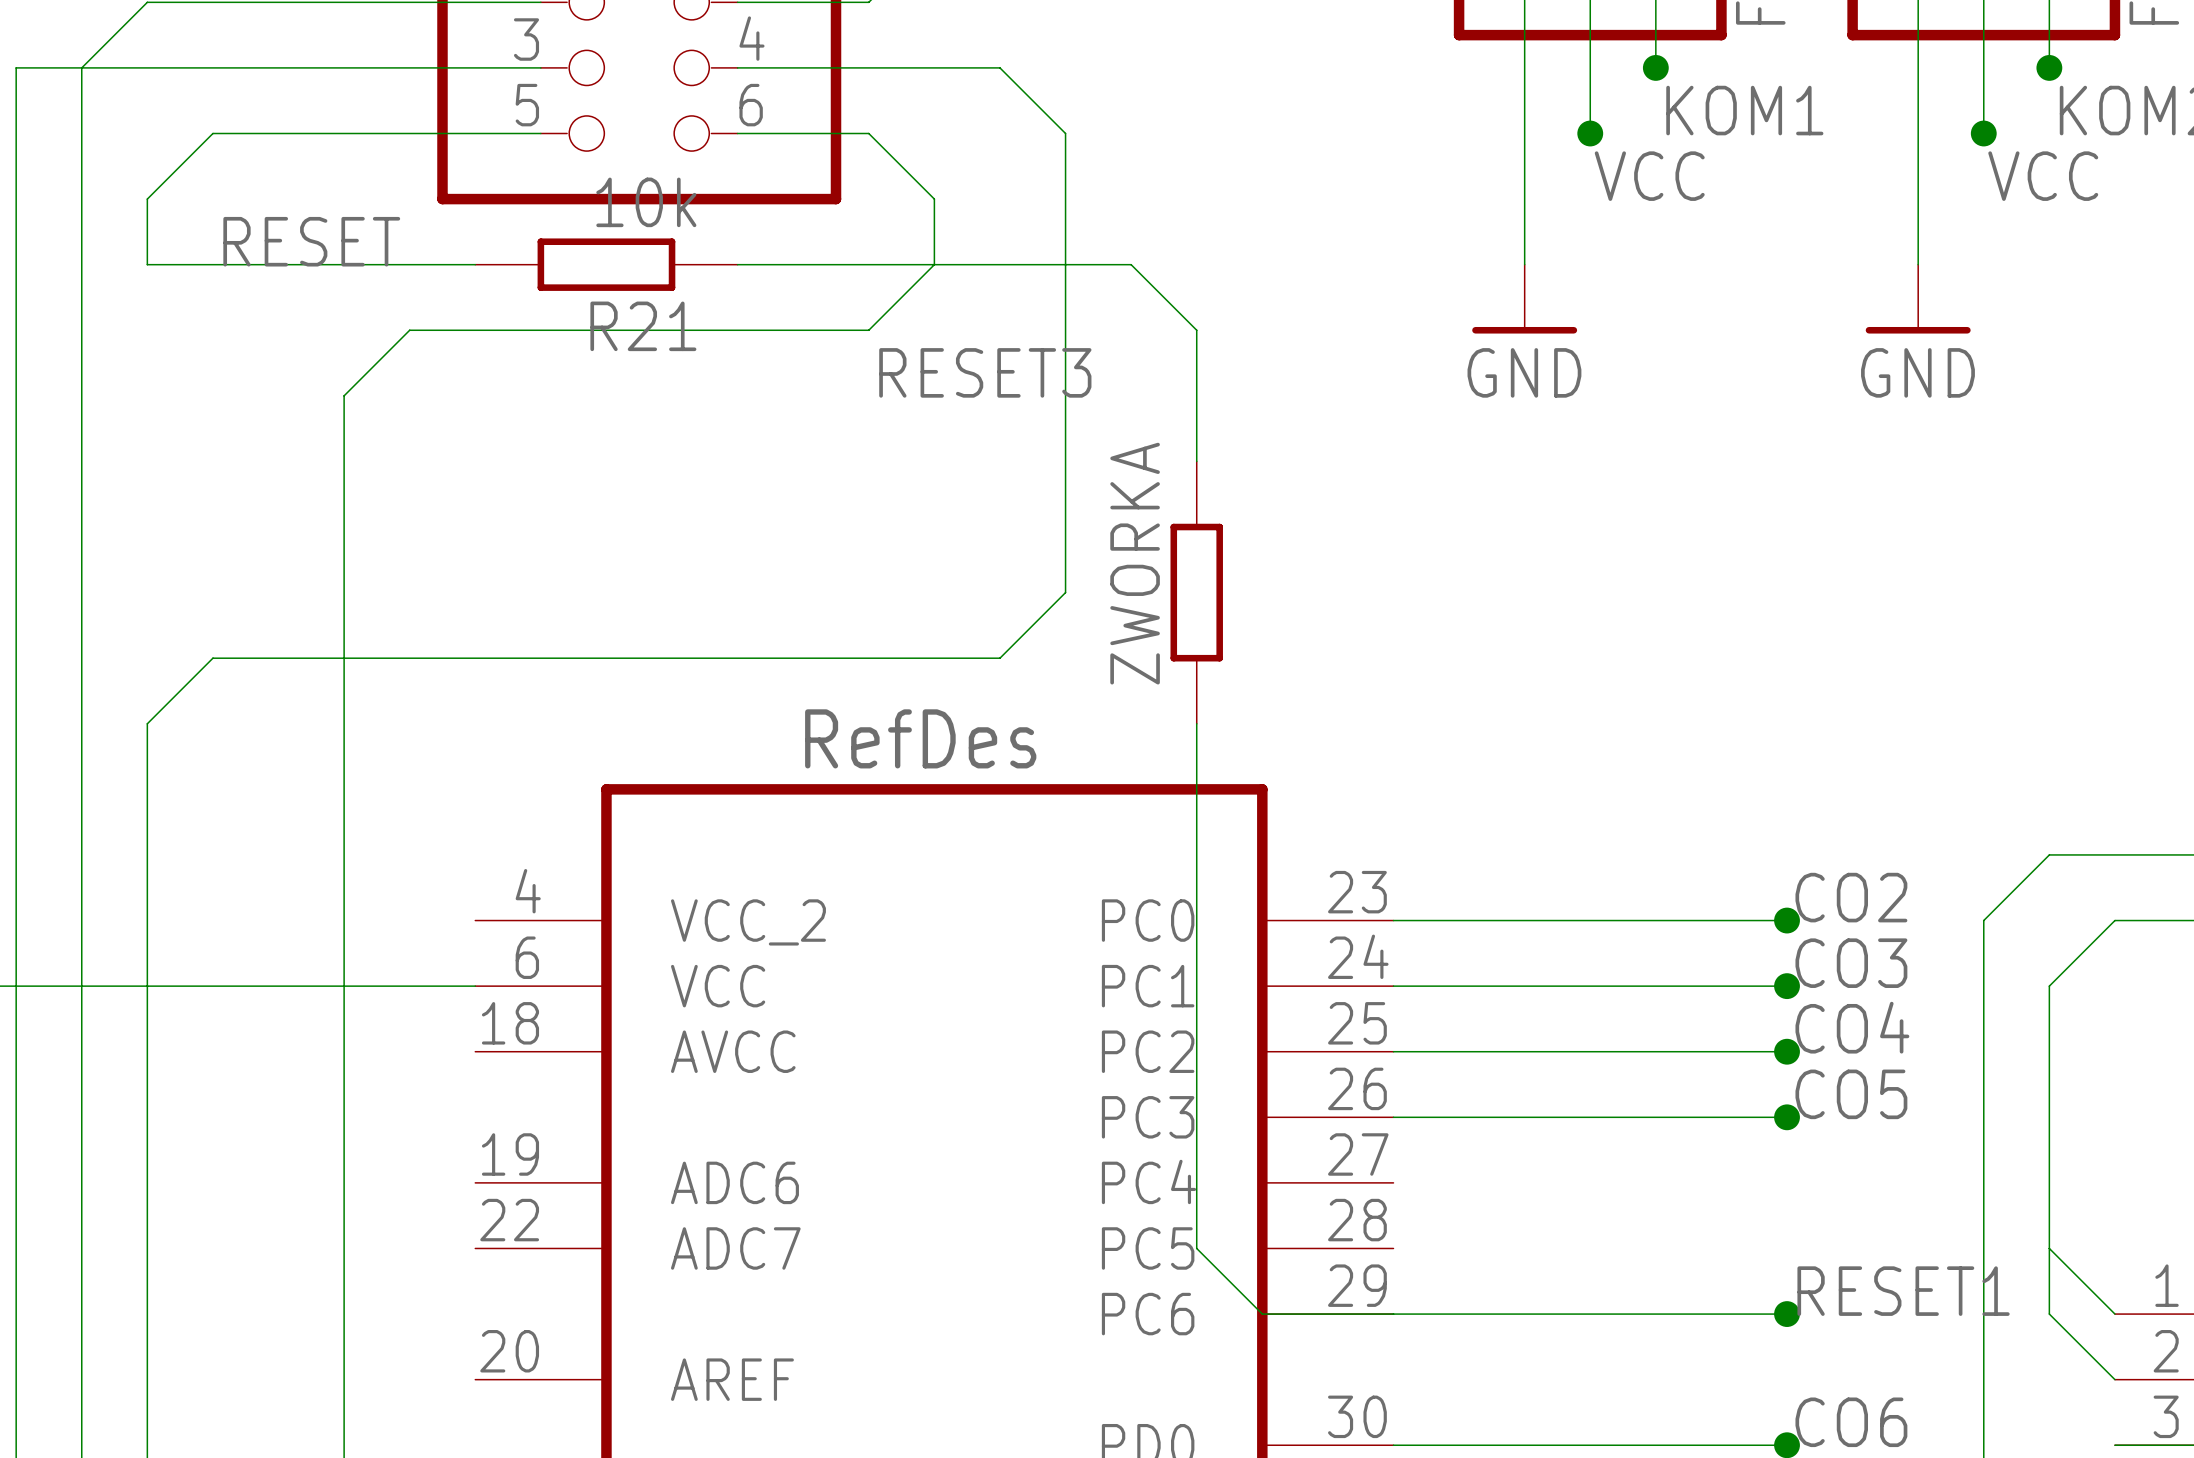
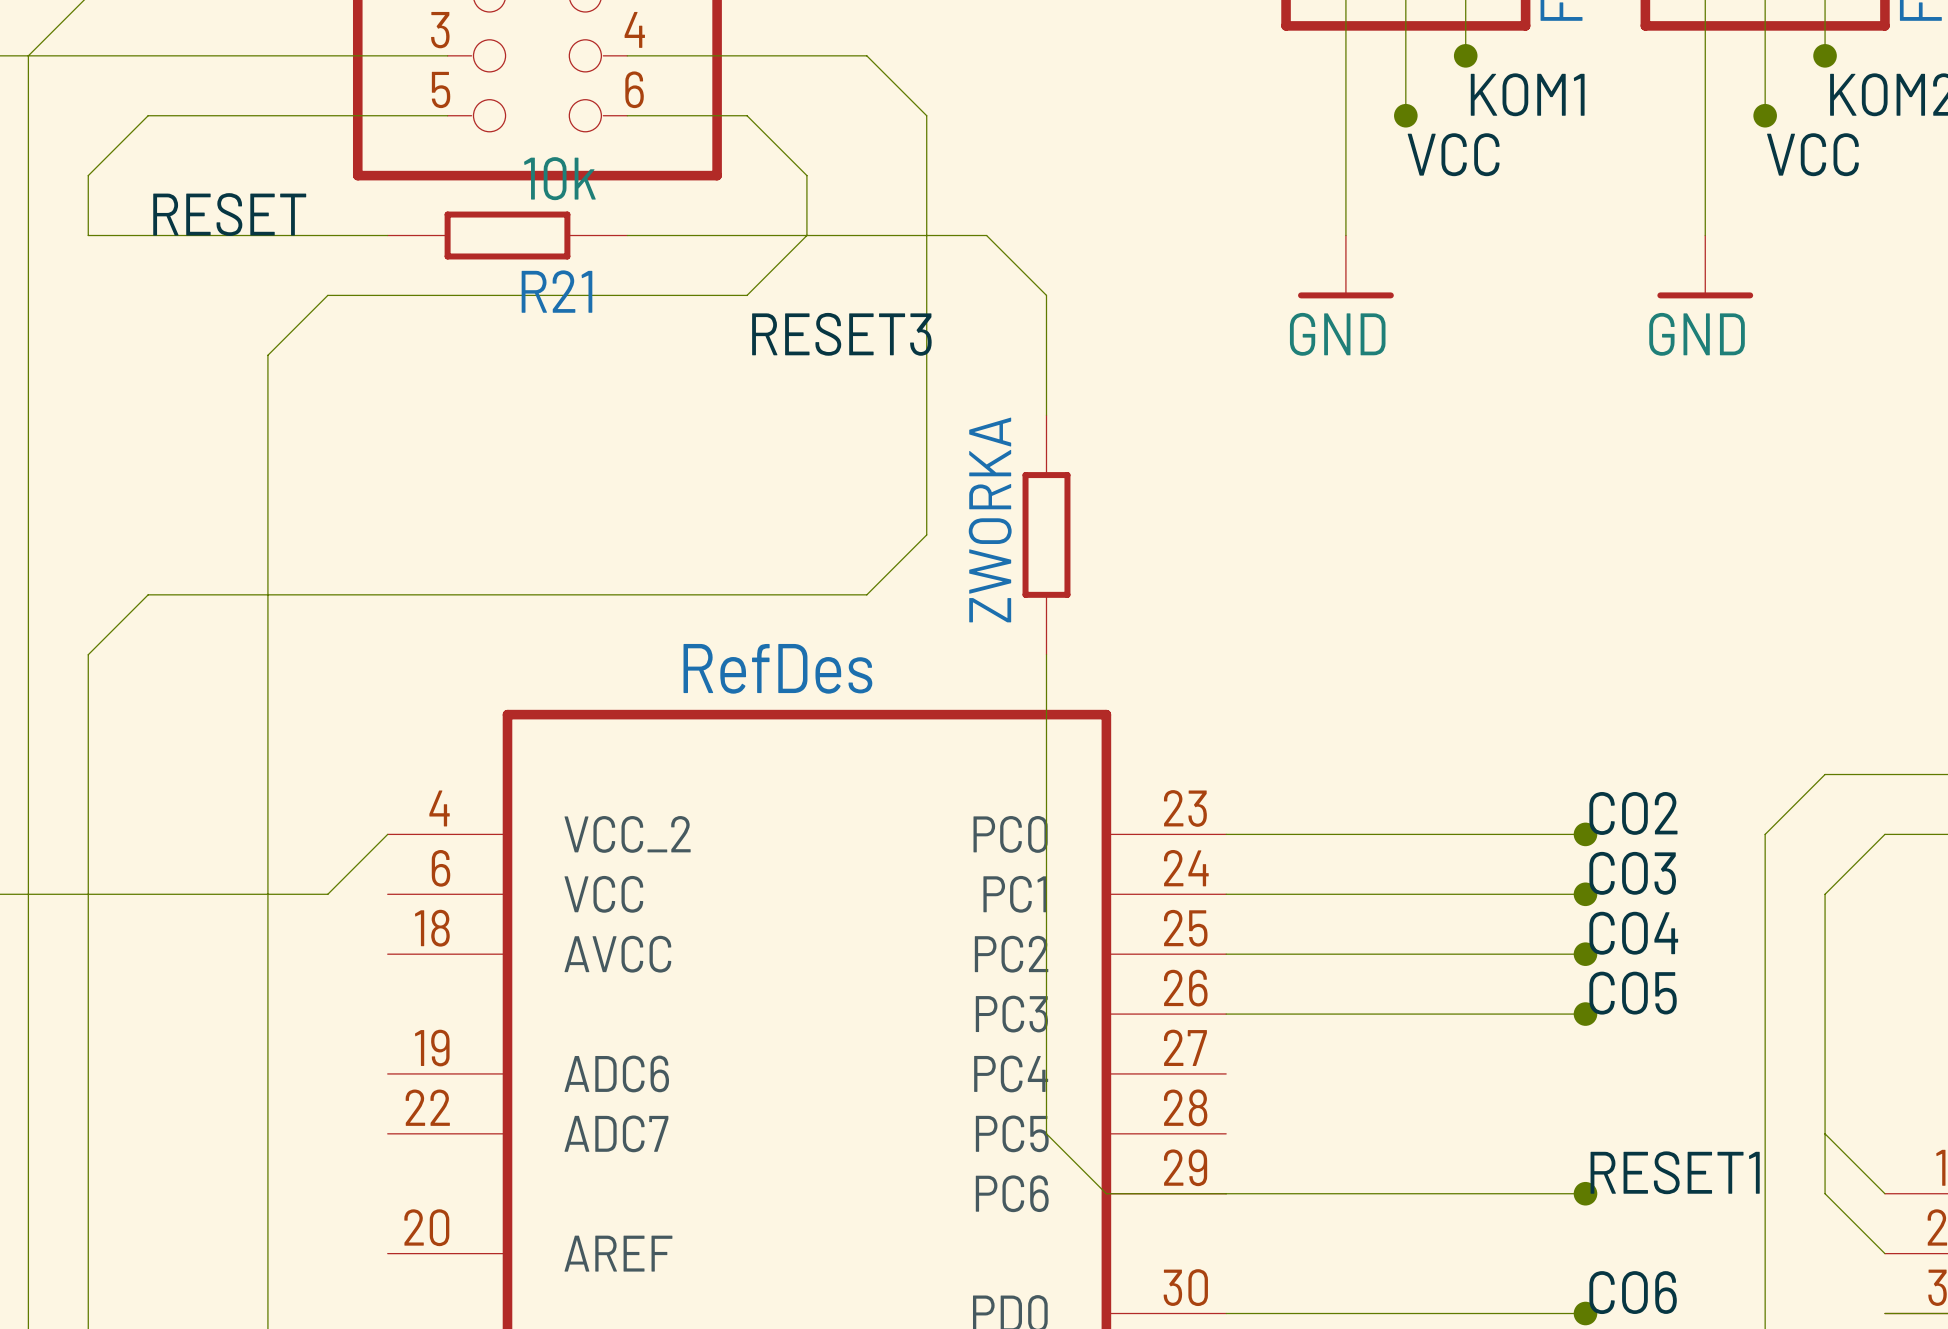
wire: (409, 986) (475, 986) -> (327, 894) (387, 834)

